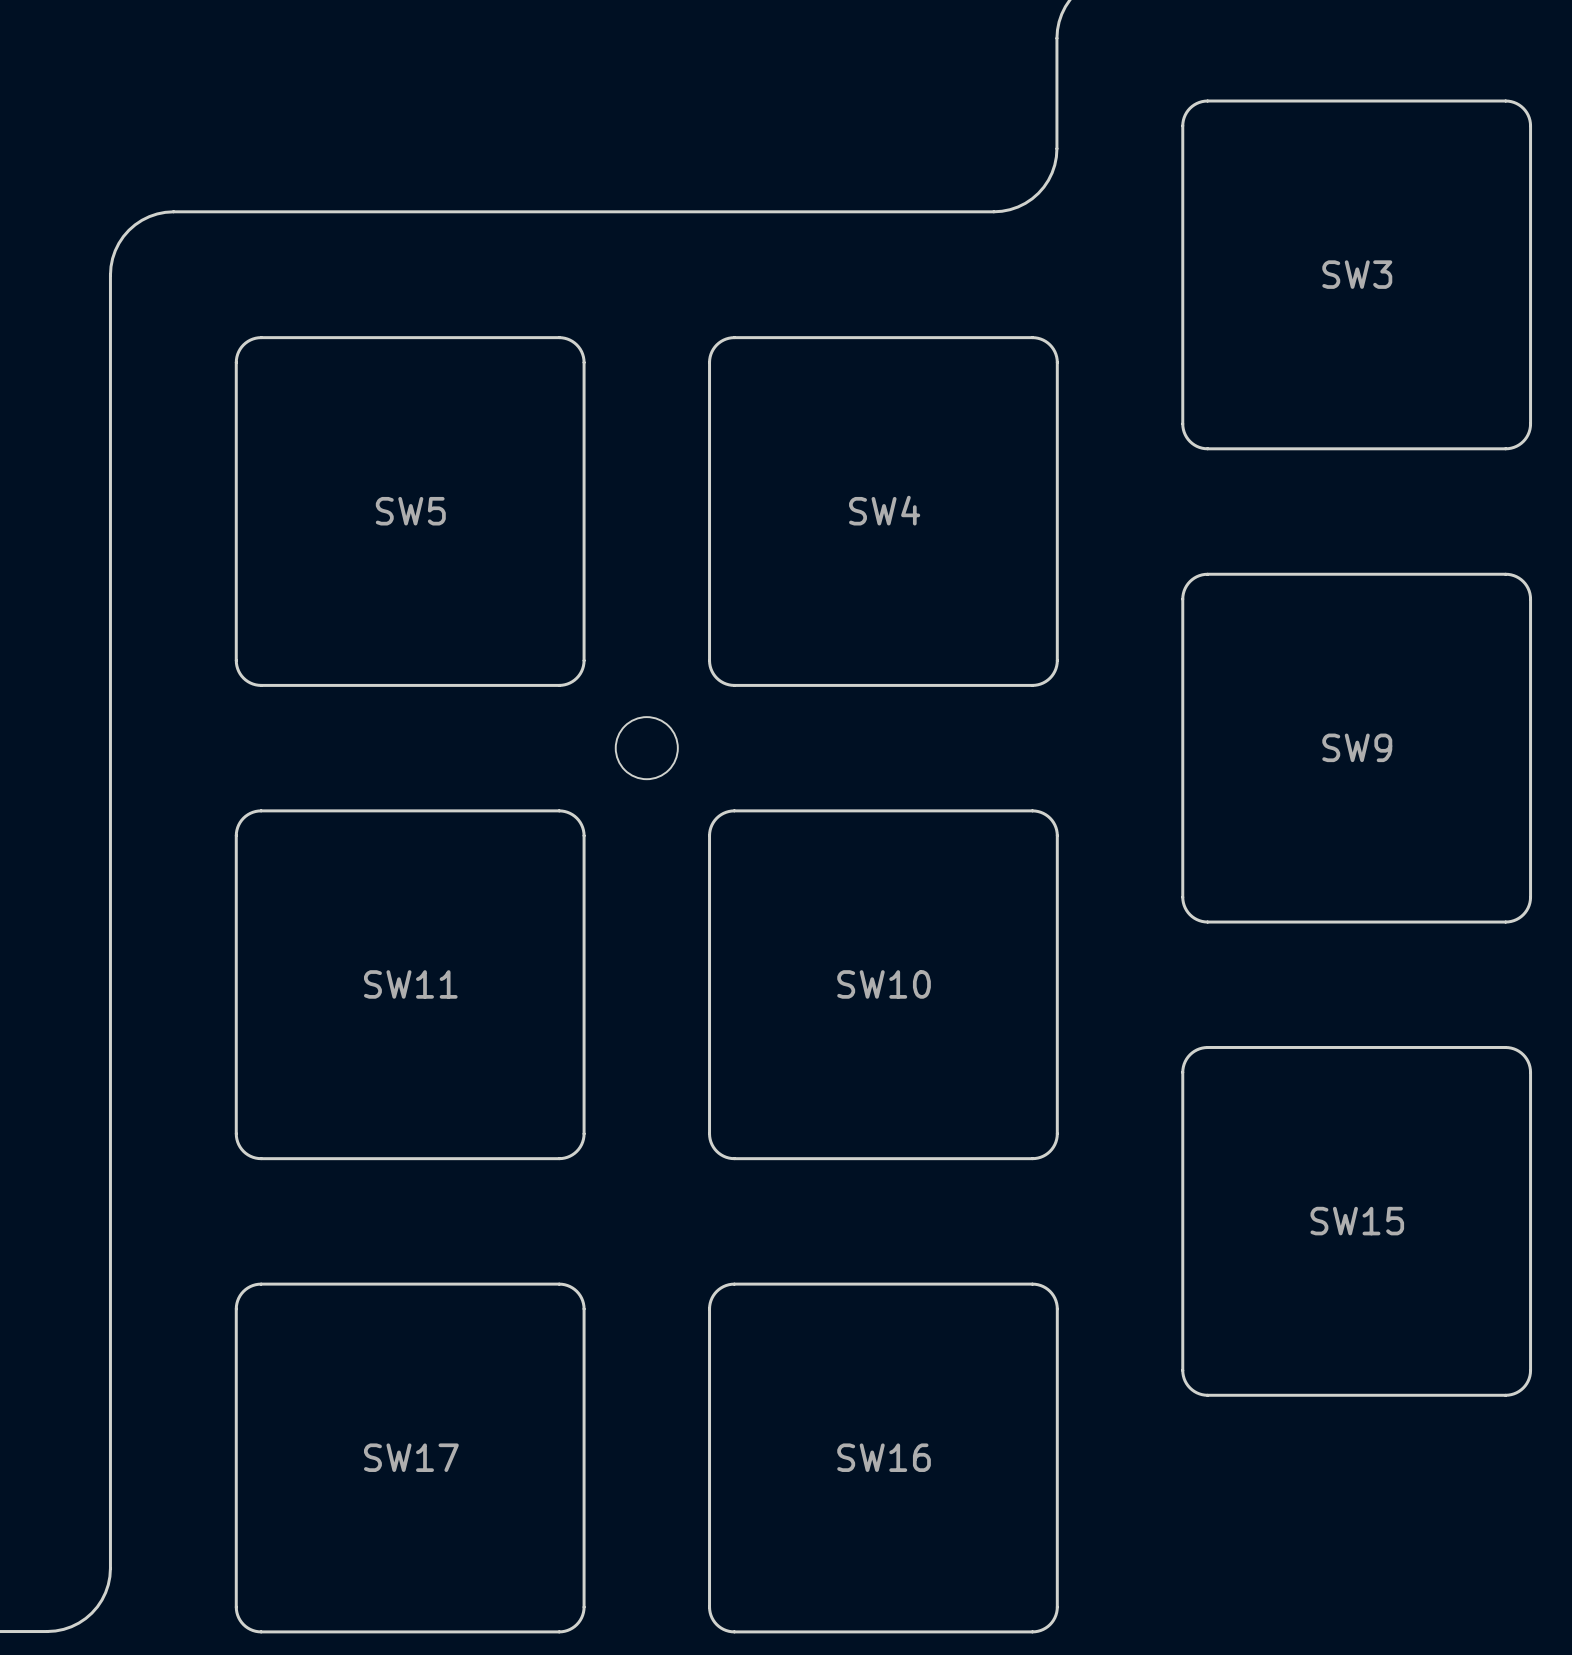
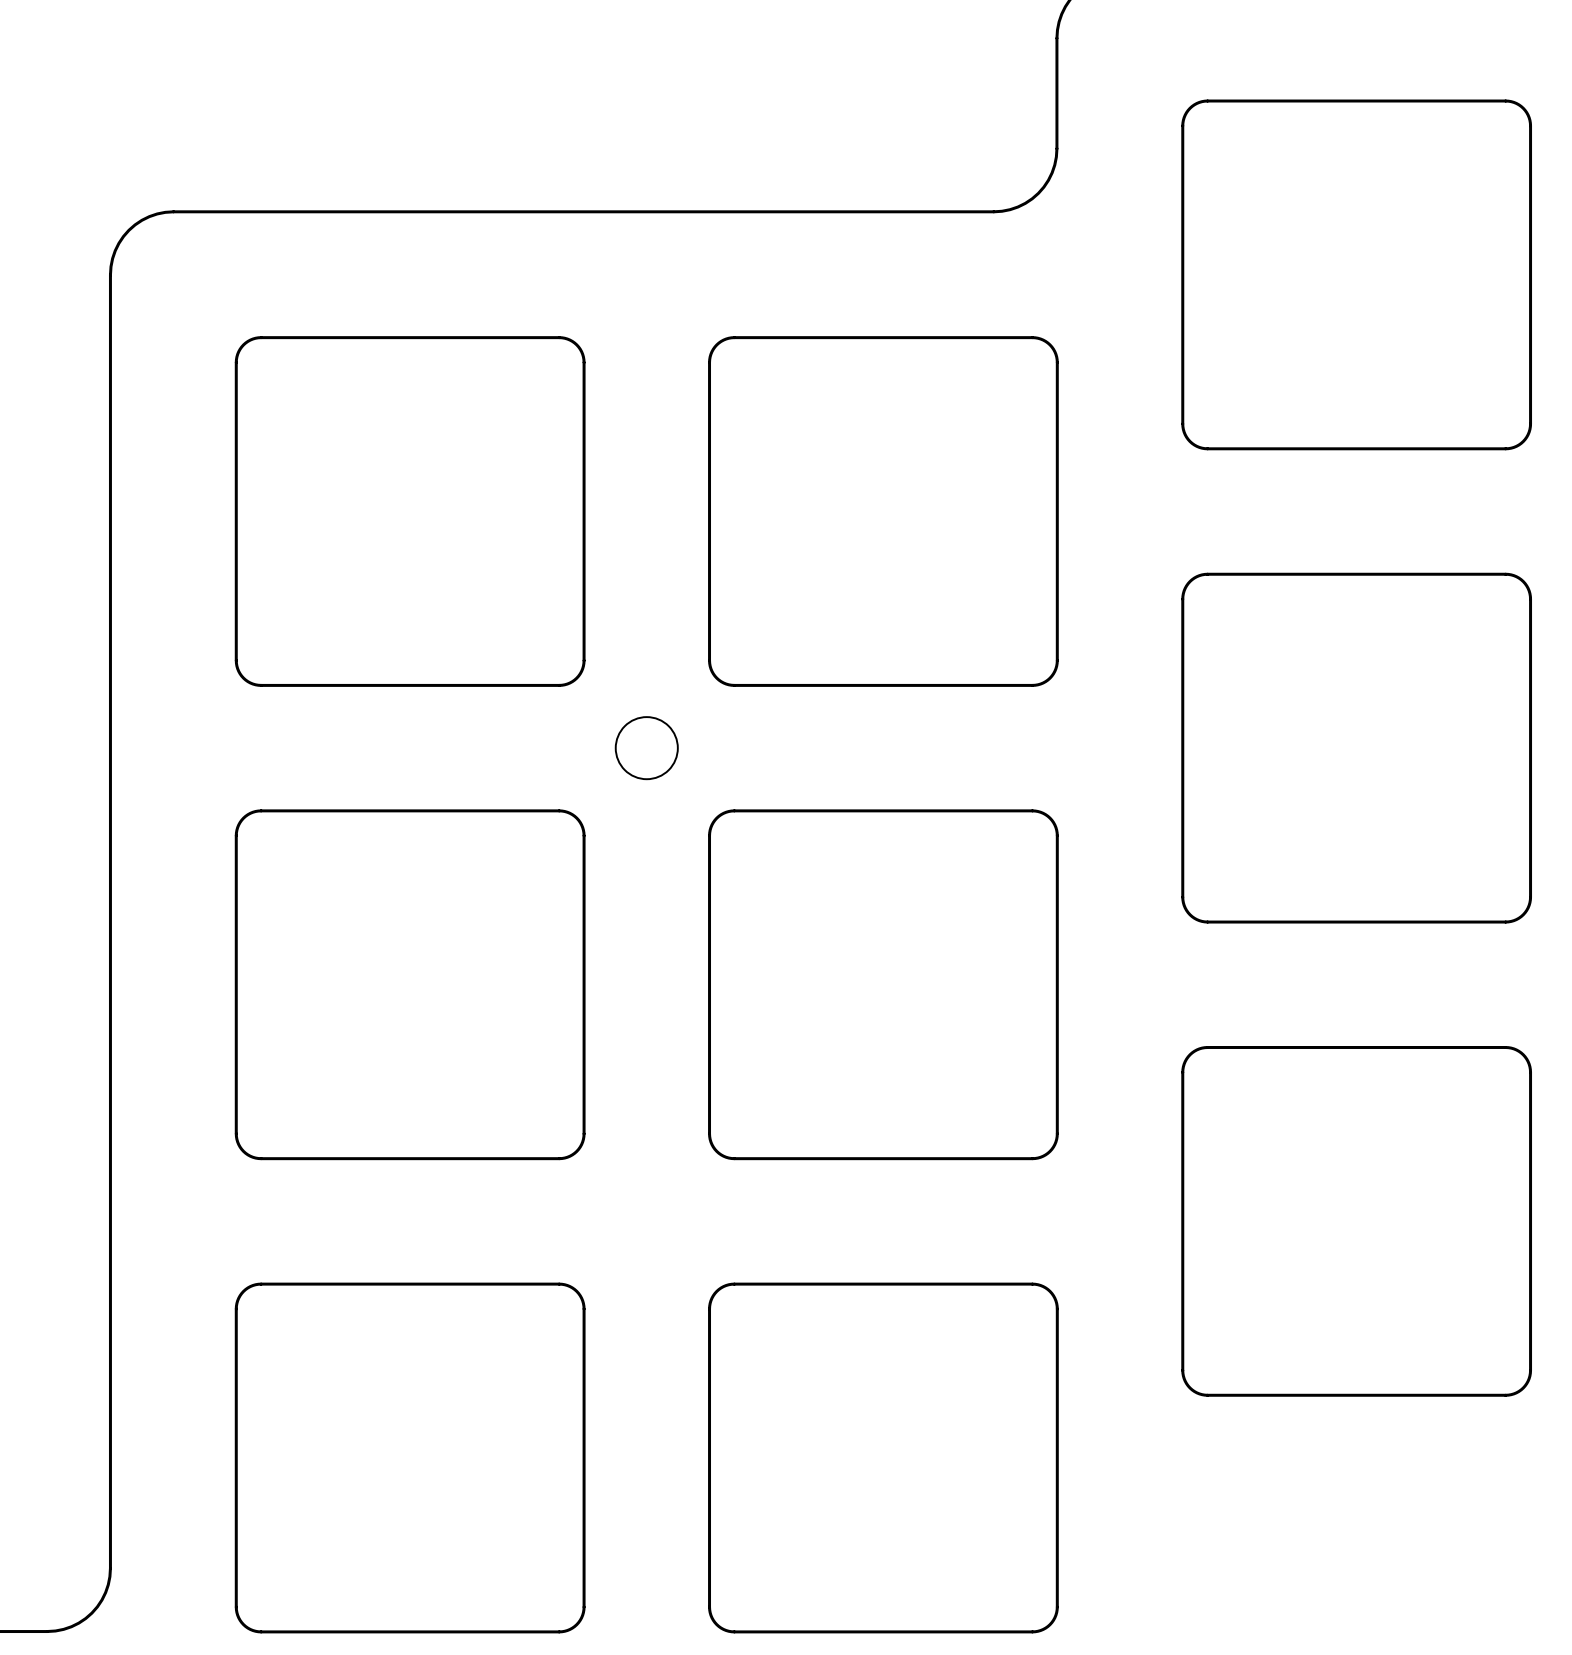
SW3: (1356, 274) -> none
SW5: (410, 511) -> none
SW4: (883, 511) -> none
SW9: (1356, 748) -> none
SW11: (410, 984) -> none
SW10: (883, 984) -> none
SW15: (1356, 1221) -> none
SW17: (410, 1458) -> none
SW16: (883, 1458) -> none

